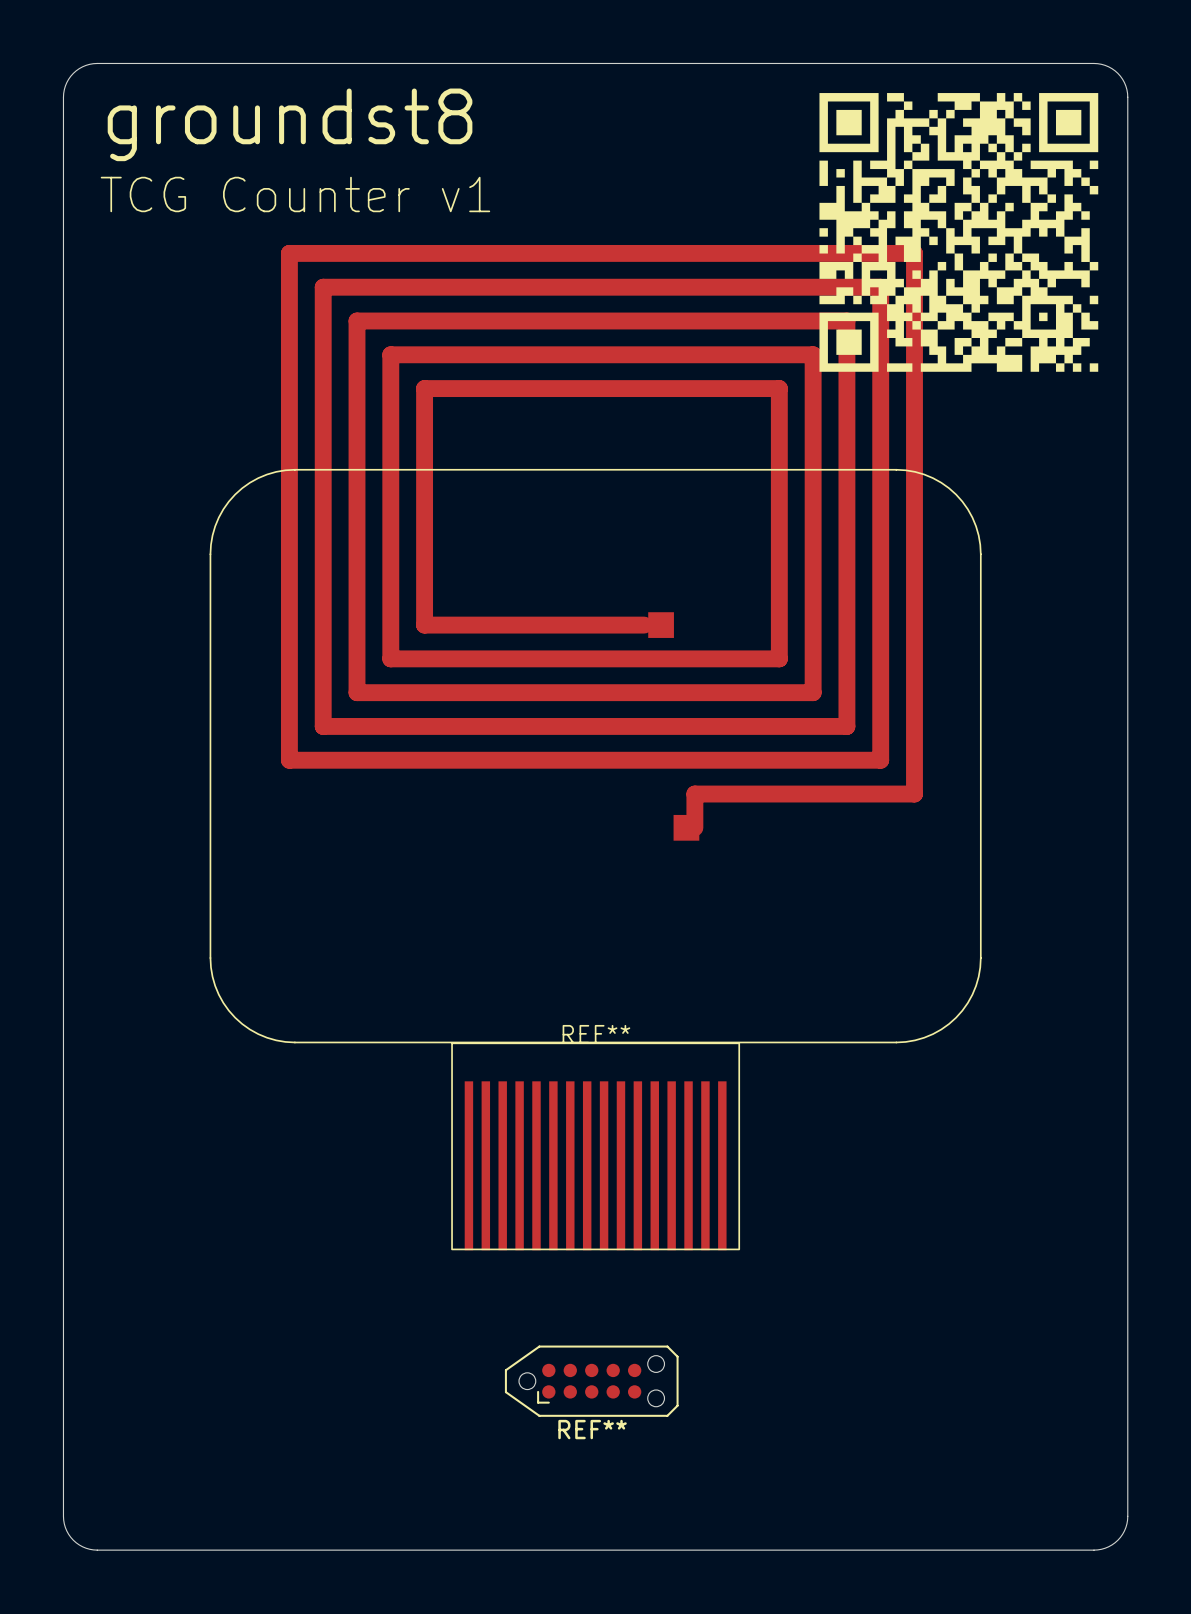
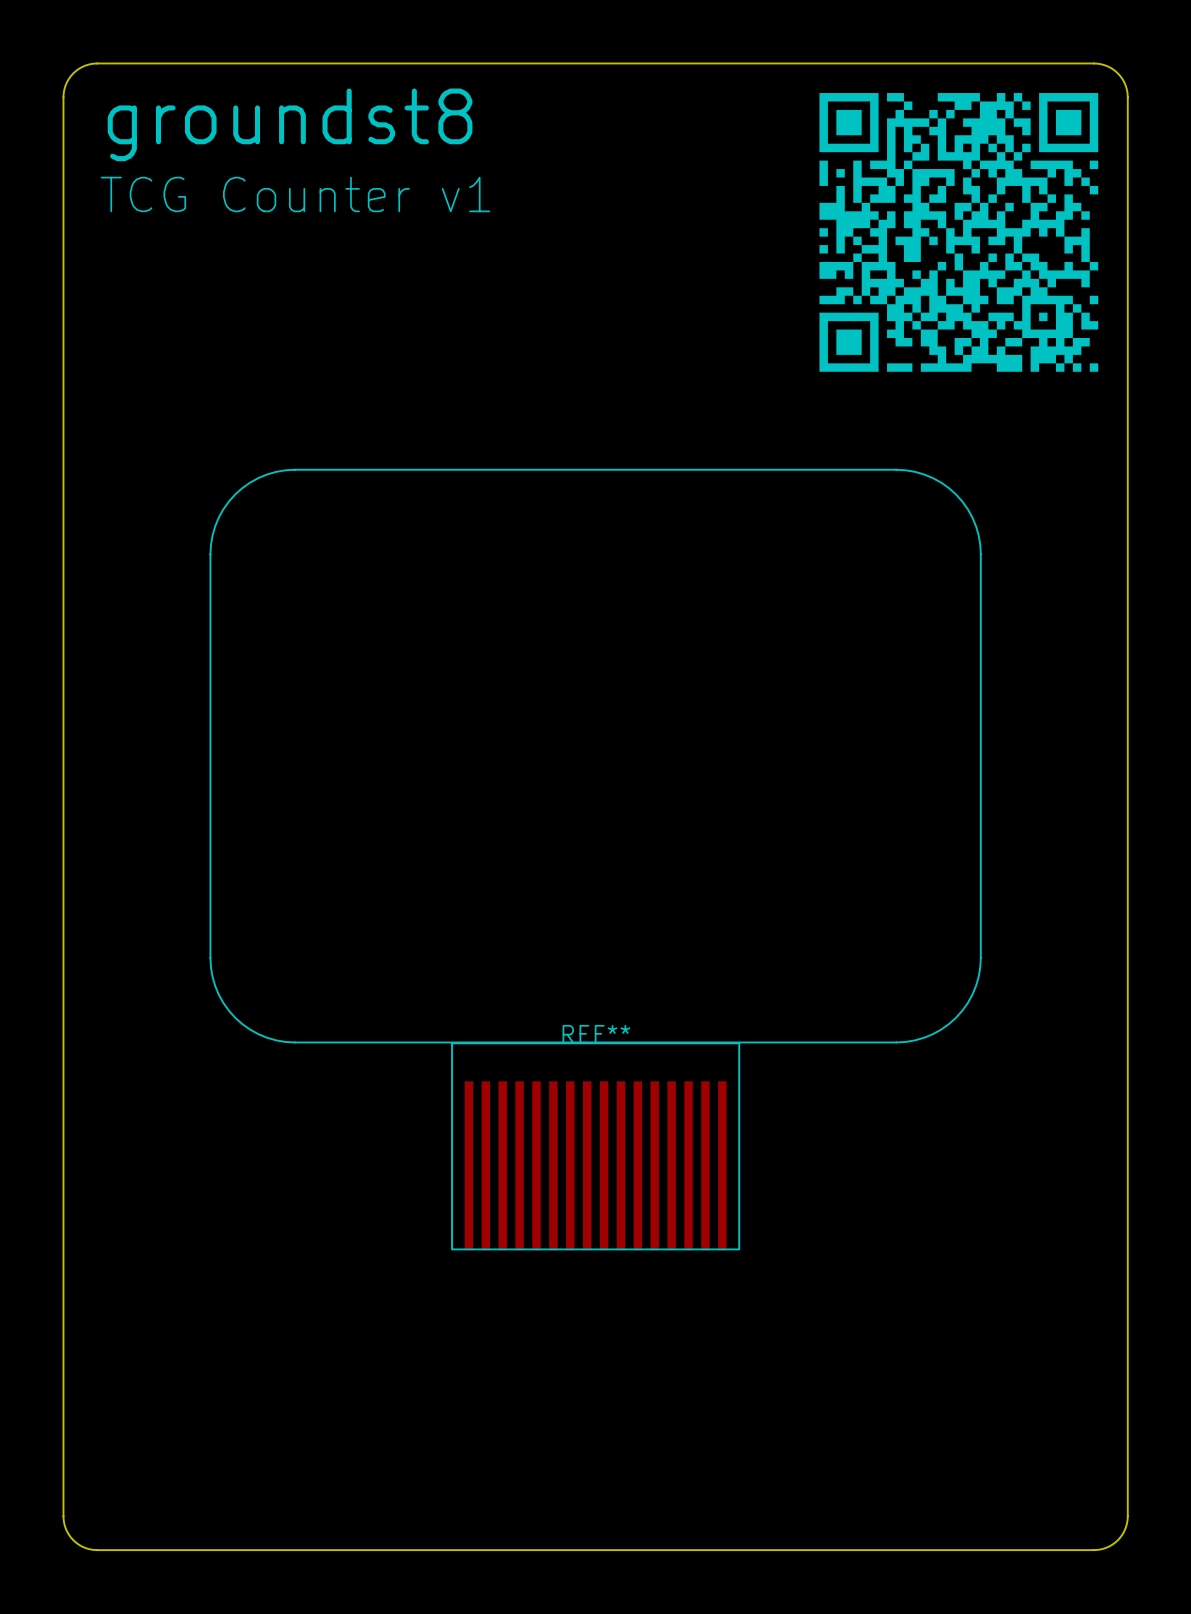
part: (601, 542) -> none
REF**: (591, 1381) -> none

